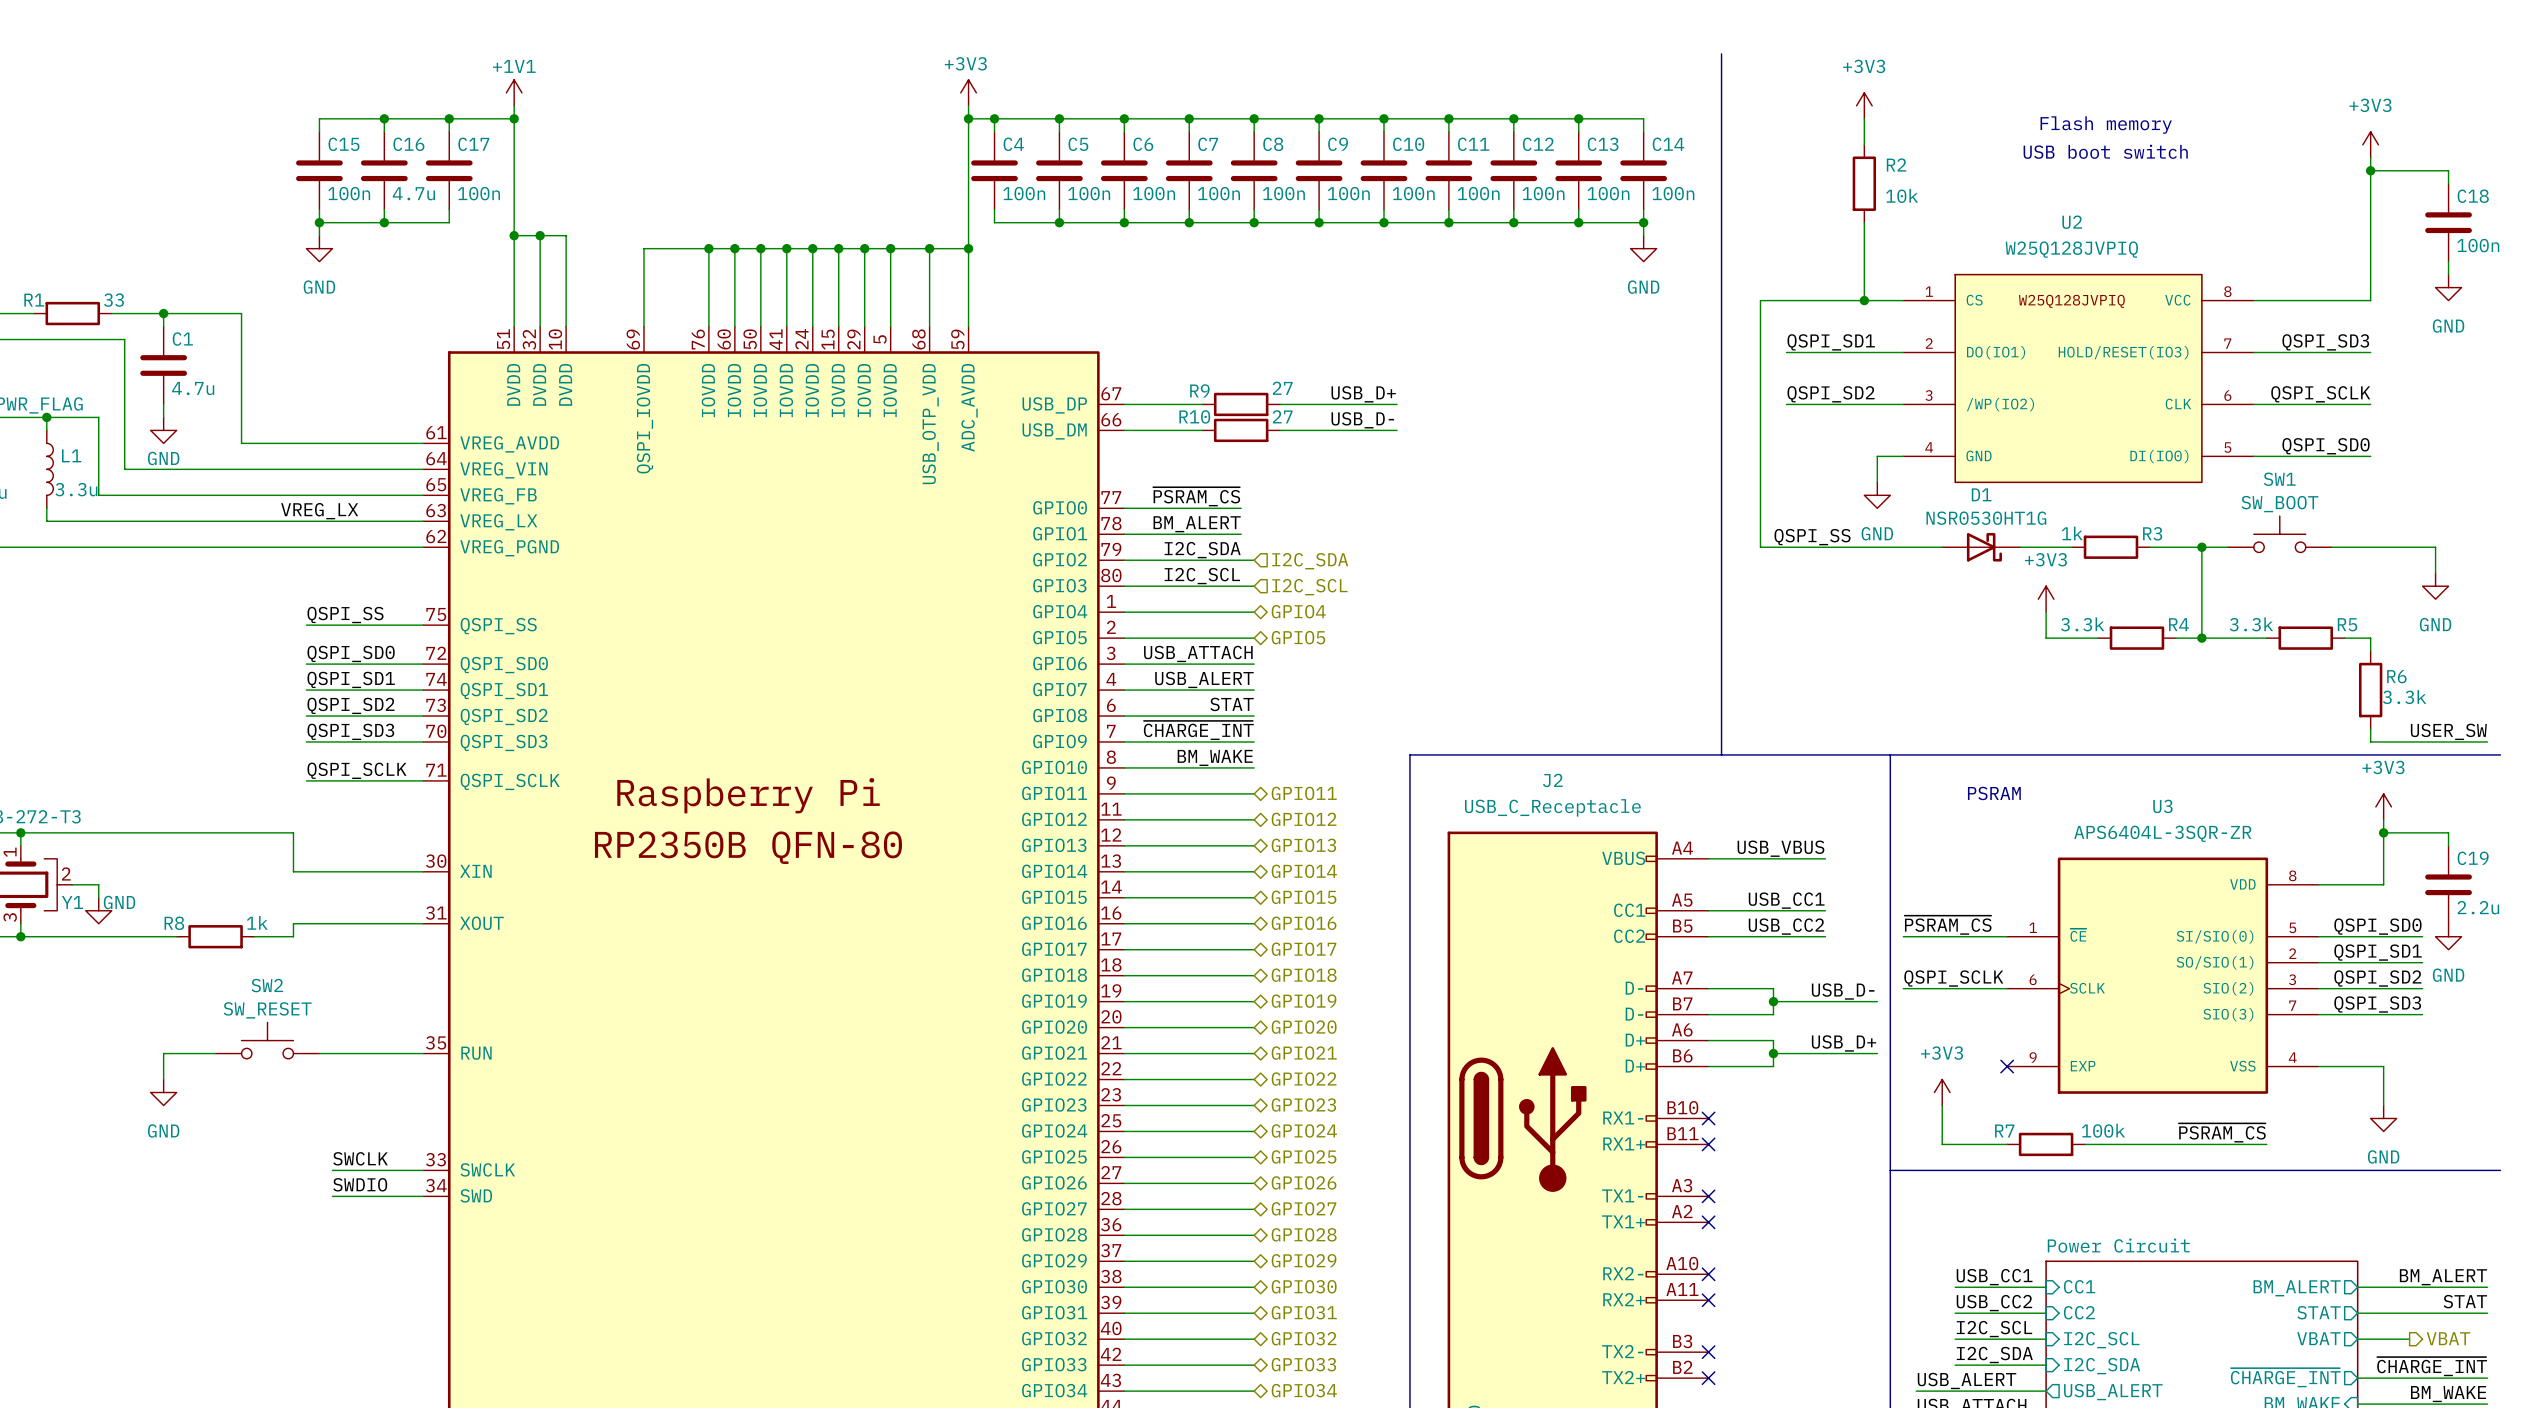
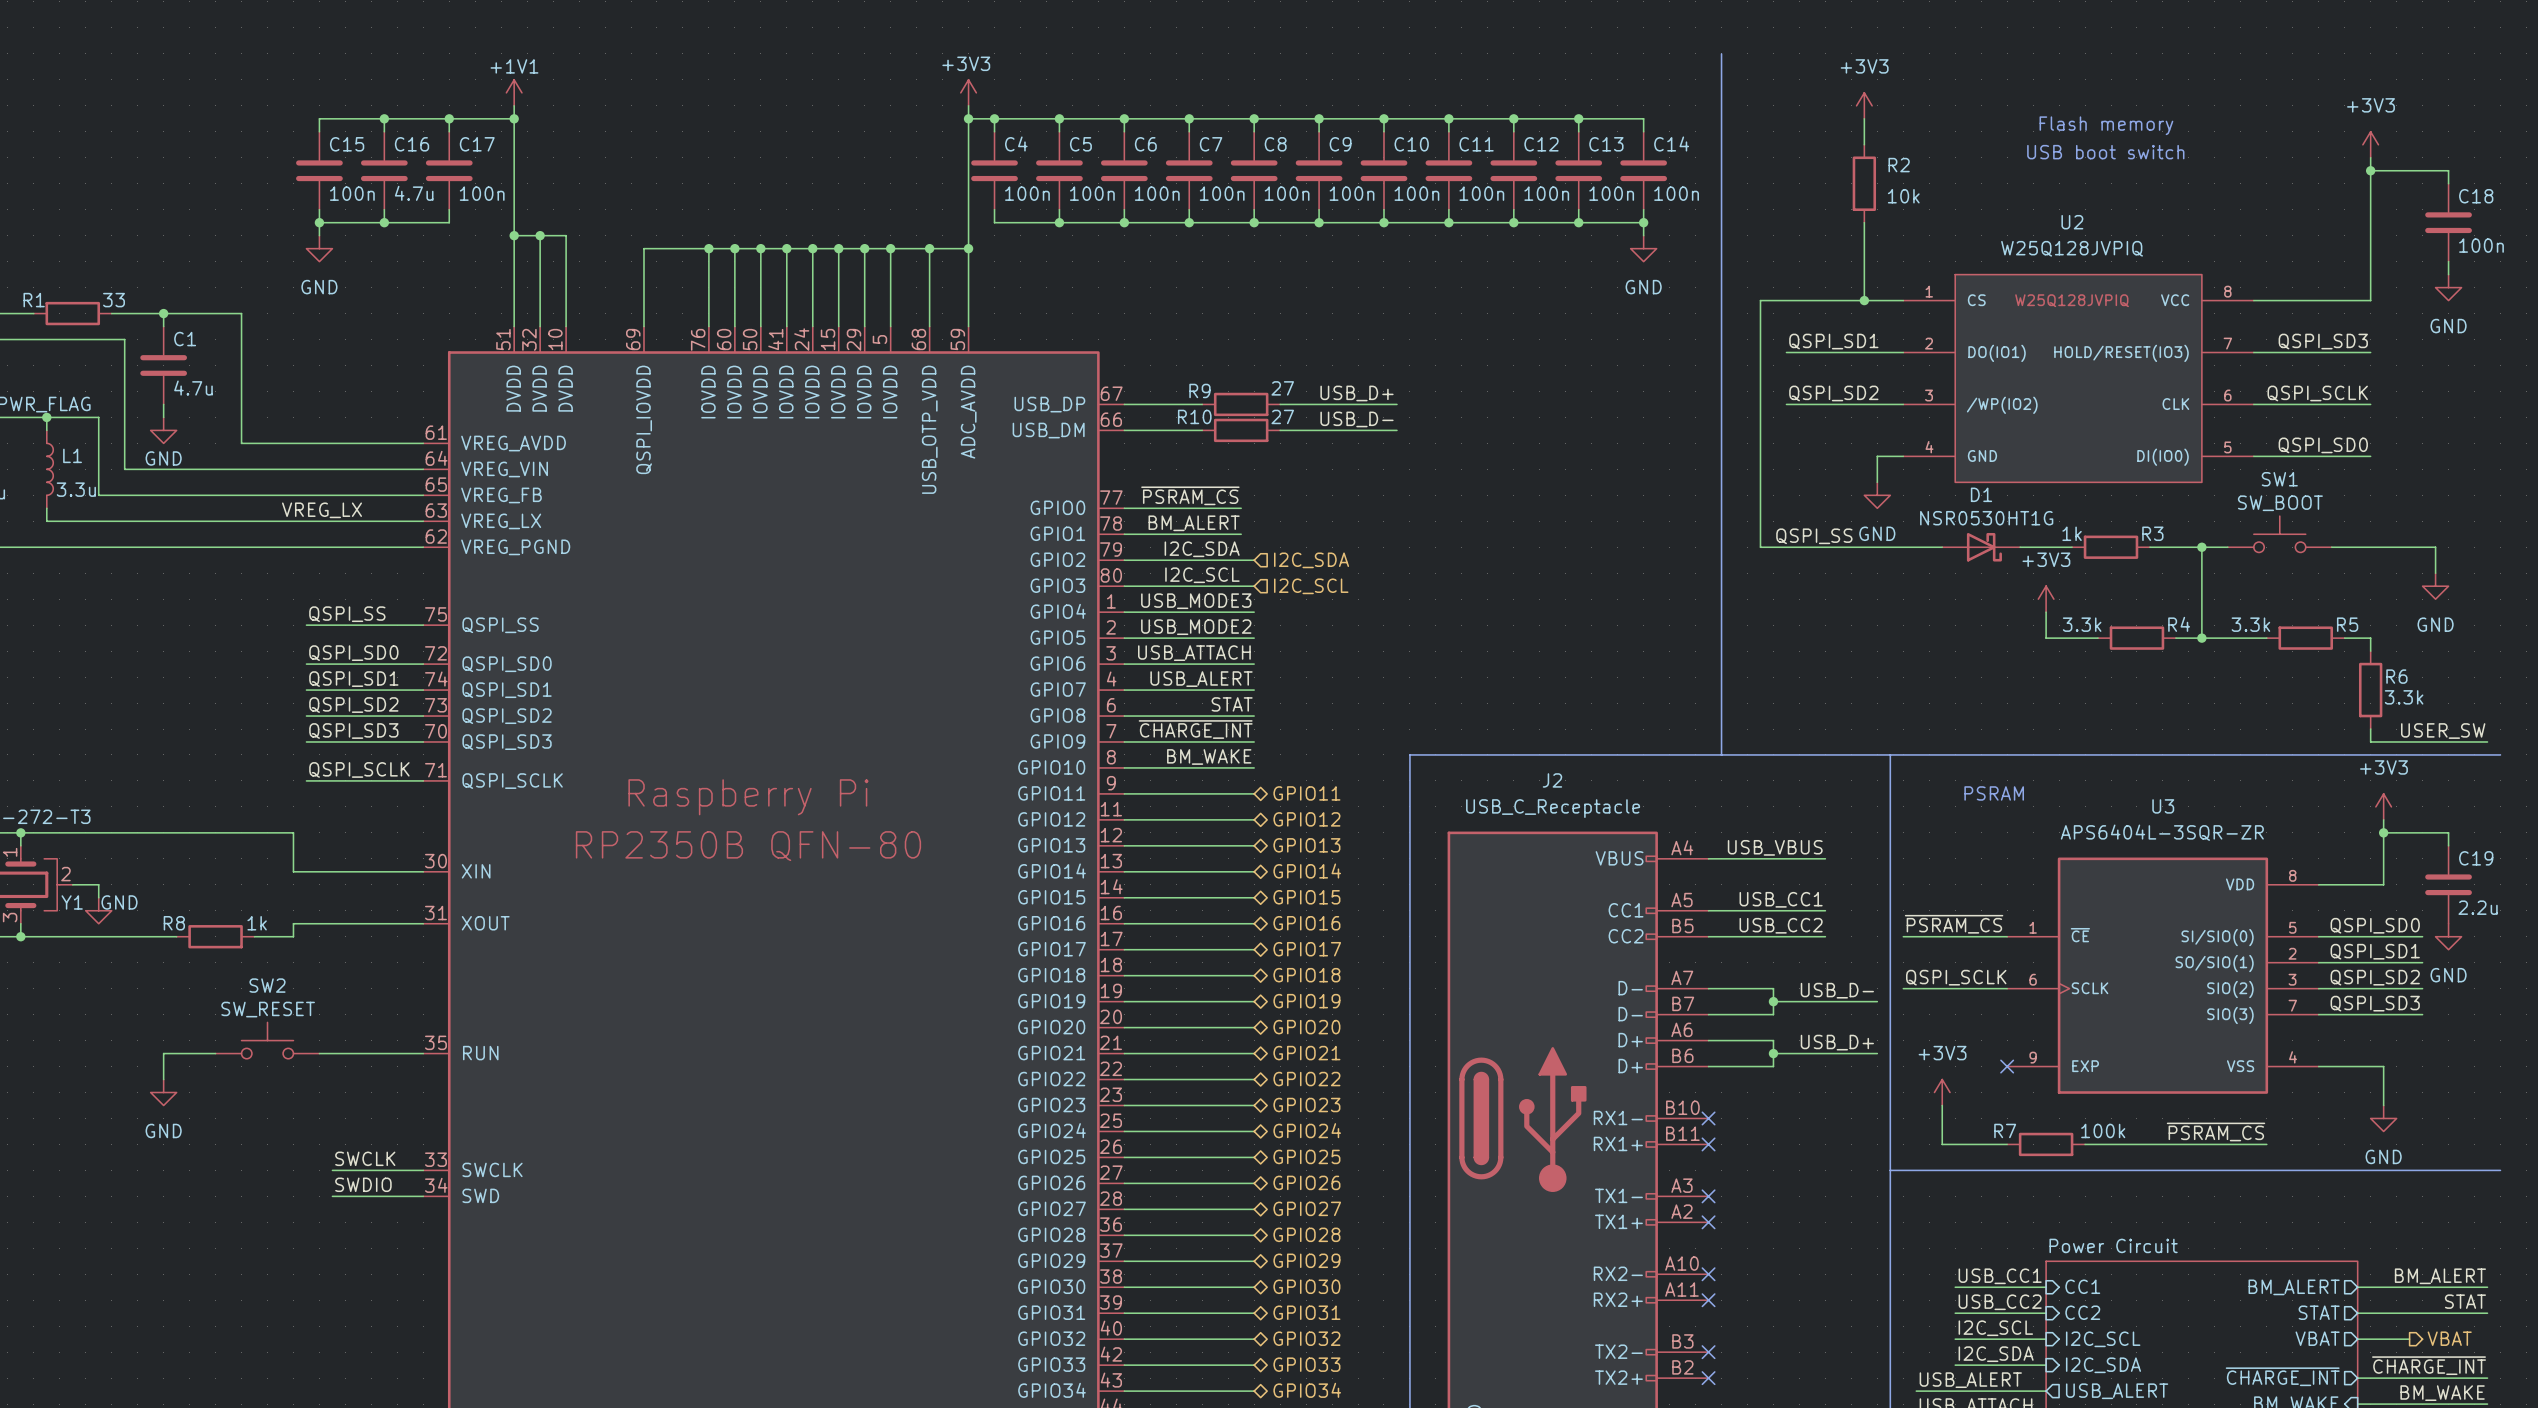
label: none -> USB_MODE3 (1196, 601)
hierarchical label: GPIO4 (1298, 611) -> none
label: none -> USB_MODE2 (1196, 627)
hierarchical label: GPIO5 (1298, 637) -> none

